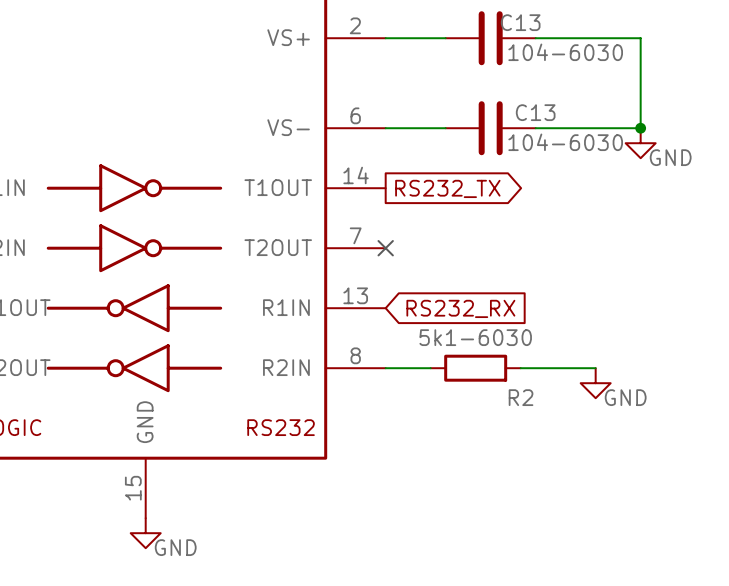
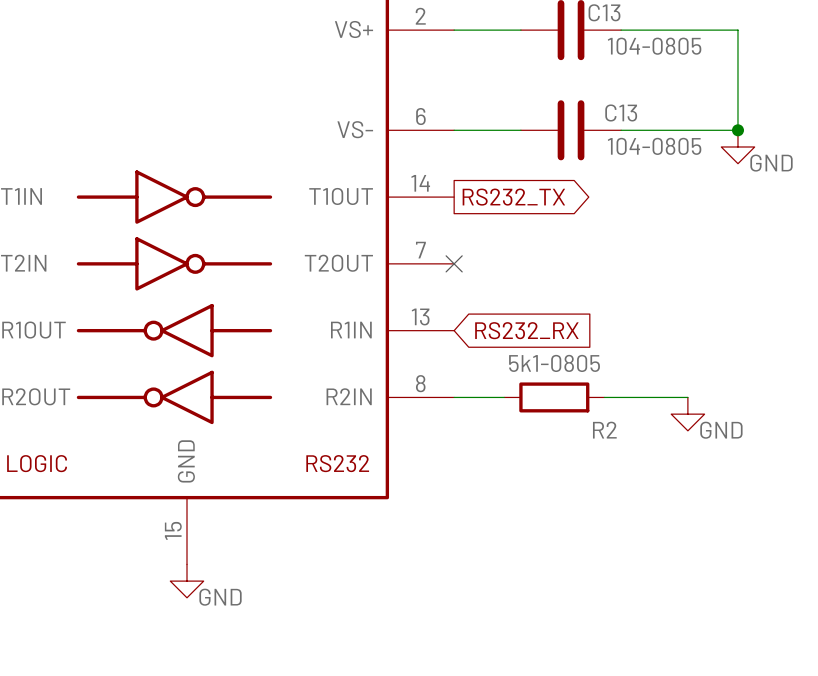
C13 value: 104-6030 (565, 52) -> 104-0805 (654, 46)
C13 value: 104-6030 (565, 142) -> 104-0805 (654, 146)
R2 value: 5k1-6030 (475, 337) -> 5k1-0805 (554, 363)

